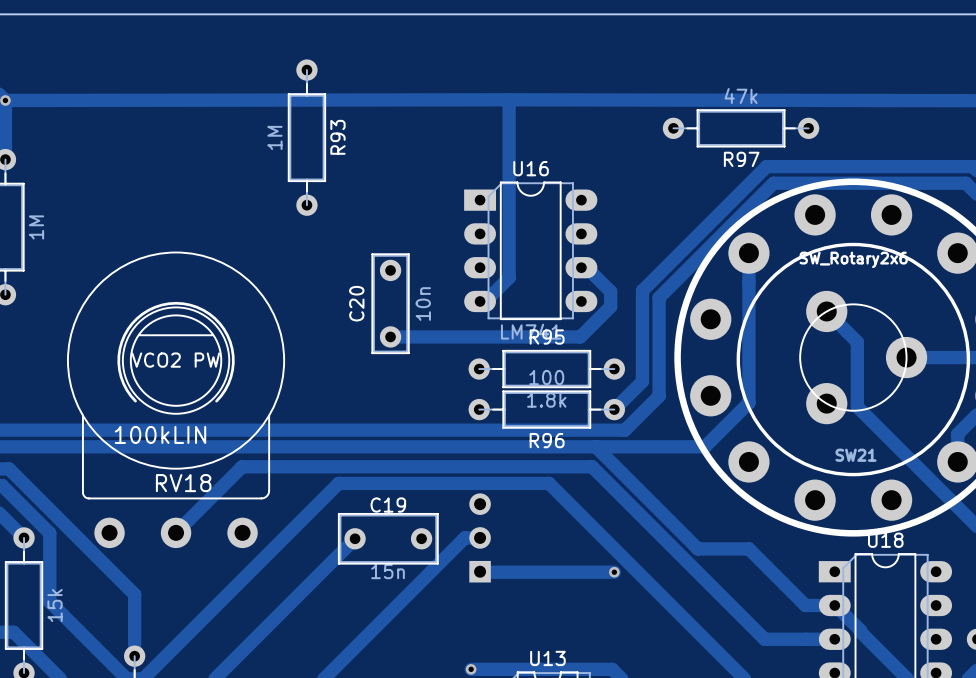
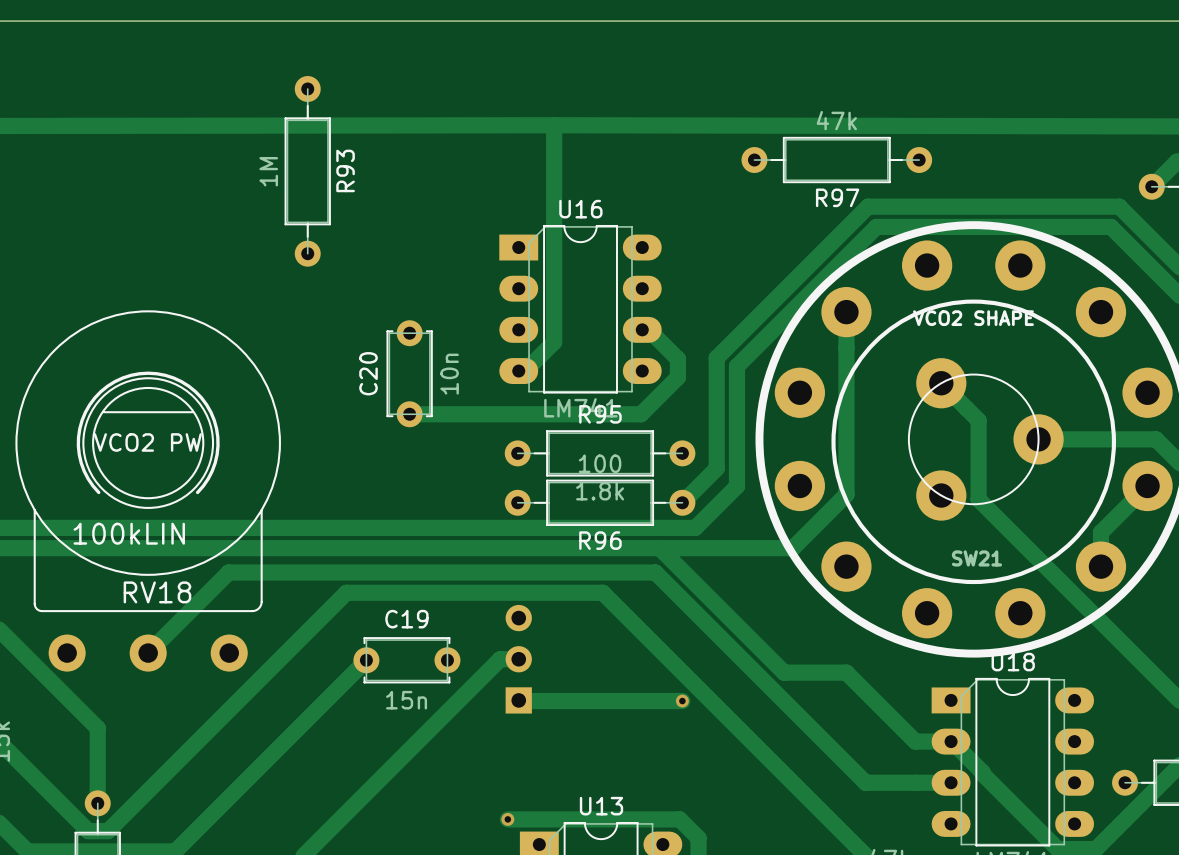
C20 footprint: [371, 253, 410, 354] -> [386, 320, 433, 428]
SW21 value: SW_Rotary2x6 (853, 259) -> VCO2 SHAPE (973, 318)
C19 footprint: [338, 513, 439, 565] -> [353, 637, 461, 684]

